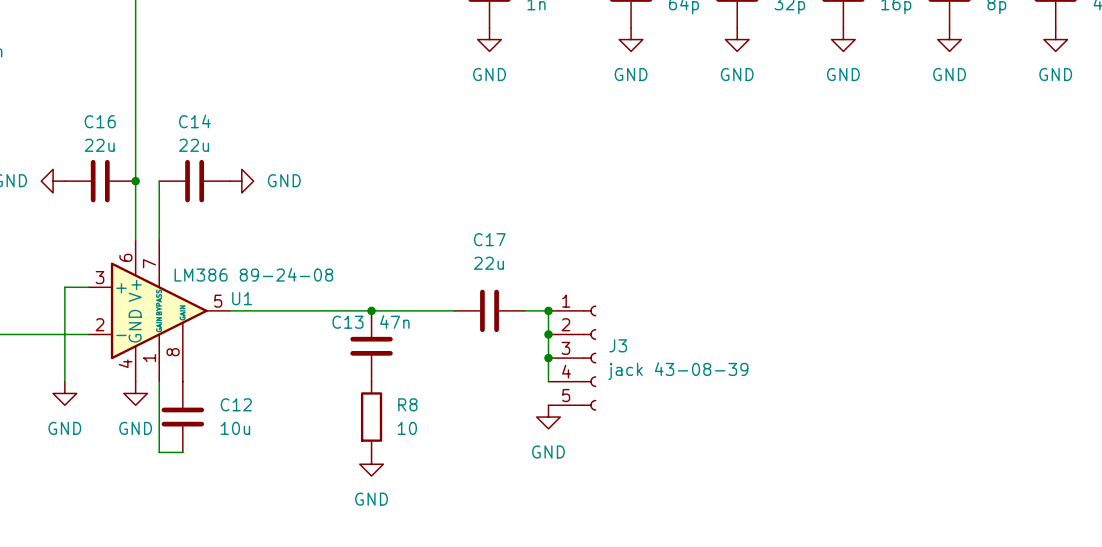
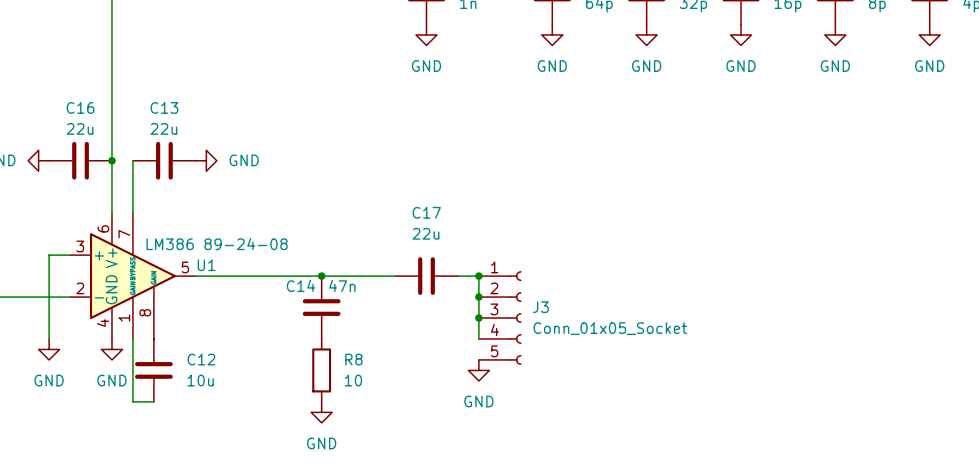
C14 name: C14 (194, 121) -> C13 (164, 107)
C13 name: C13 (347, 322) -> C14 (300, 285)
J3 value: jack 43-08-39 (678, 371) -> Conn_01x05_Socket (610, 328)

